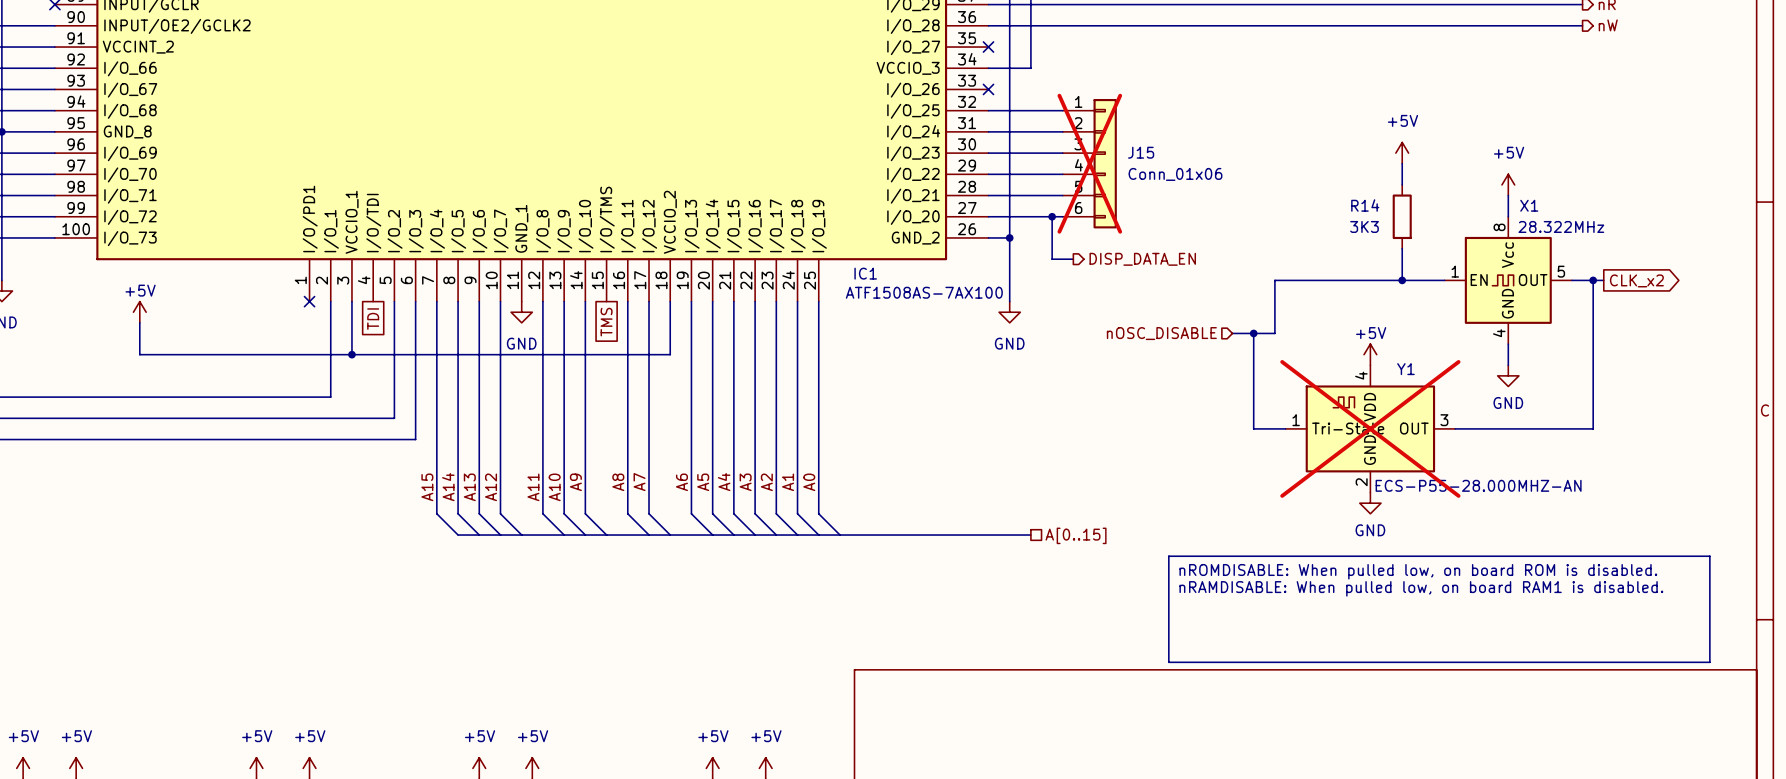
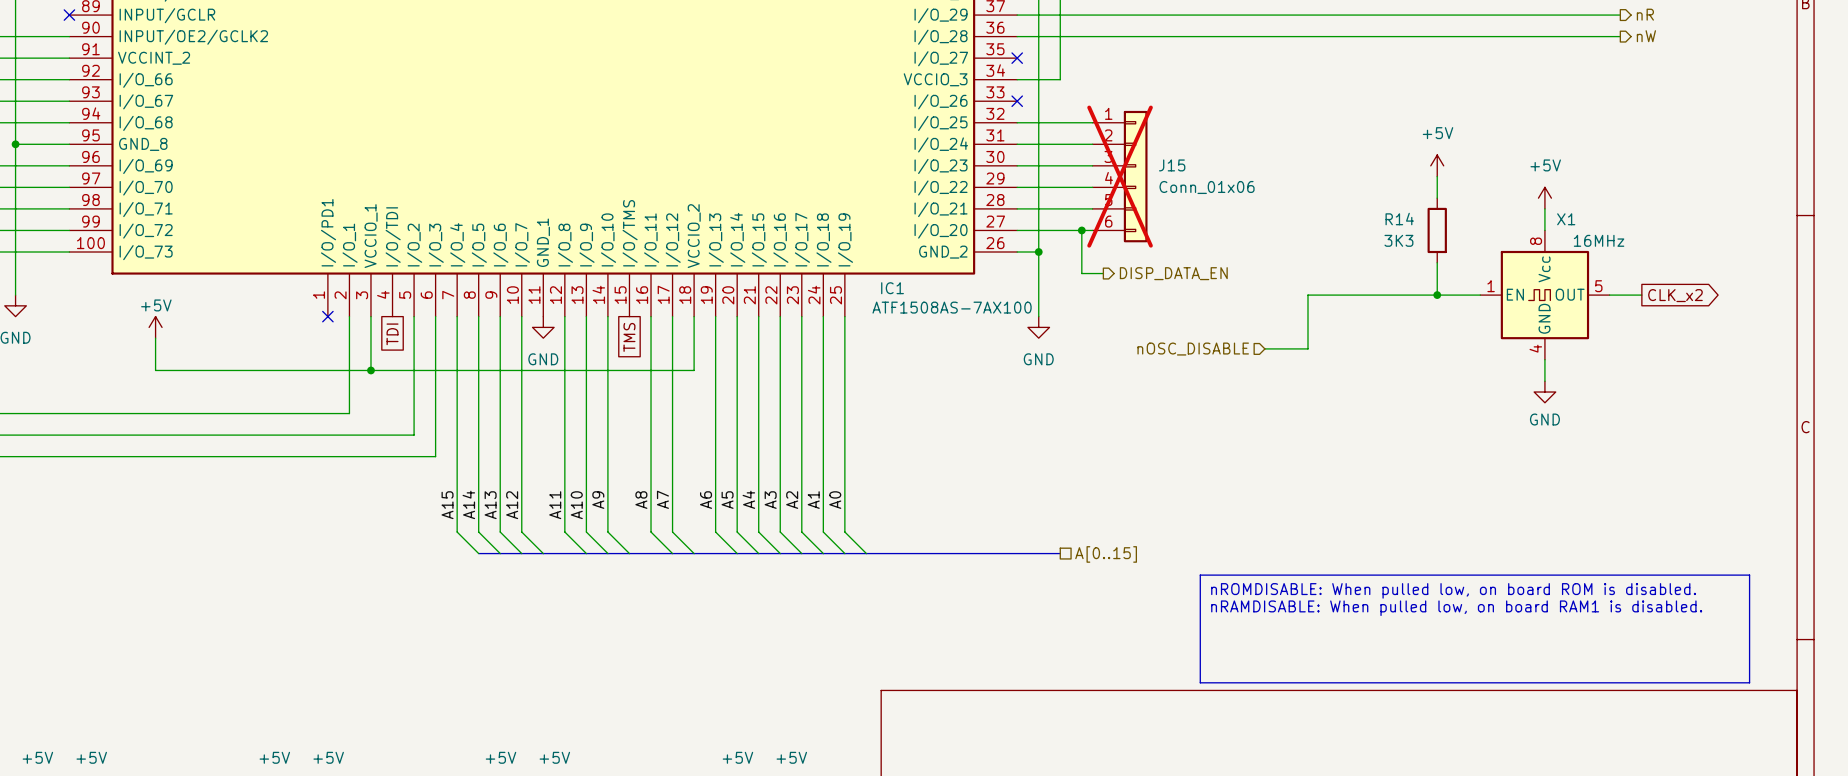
X1 value: 28.322MHz (1561, 226) -> 16MHz (1599, 240)
wire: (1593, 280) (1593, 428) (1455, 428) -> none
junction: (1593, 280) -> none
wire: (1253, 333) (1253, 428) (1285, 428) -> none
junction: (1253, 333) -> none
power symbol: +5V (1370, 354) -> none
Y1: ECS-P55-28.000MHZ-AN (1370, 428) -> none
power symbol: GND (1370, 503) -> none

